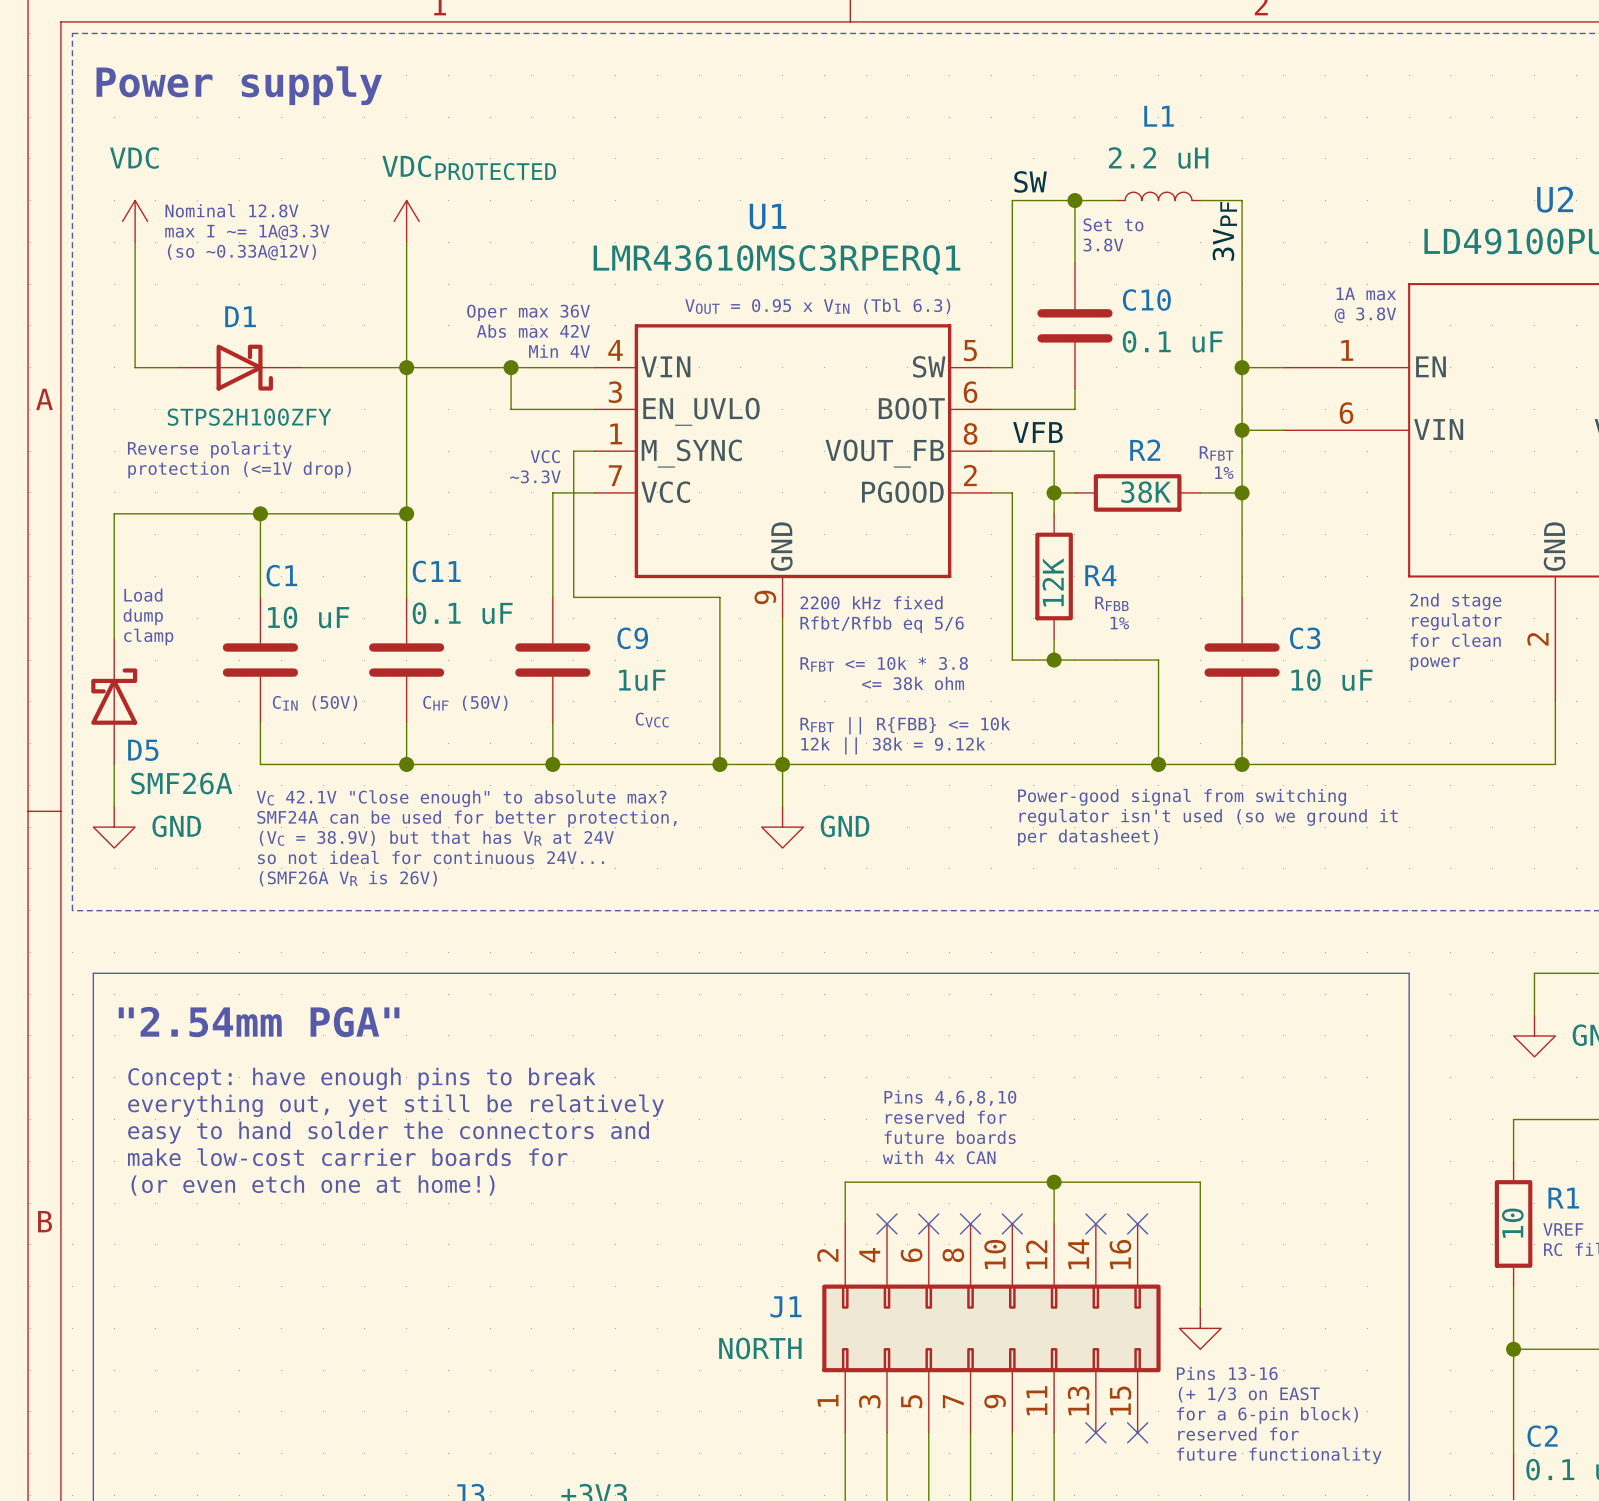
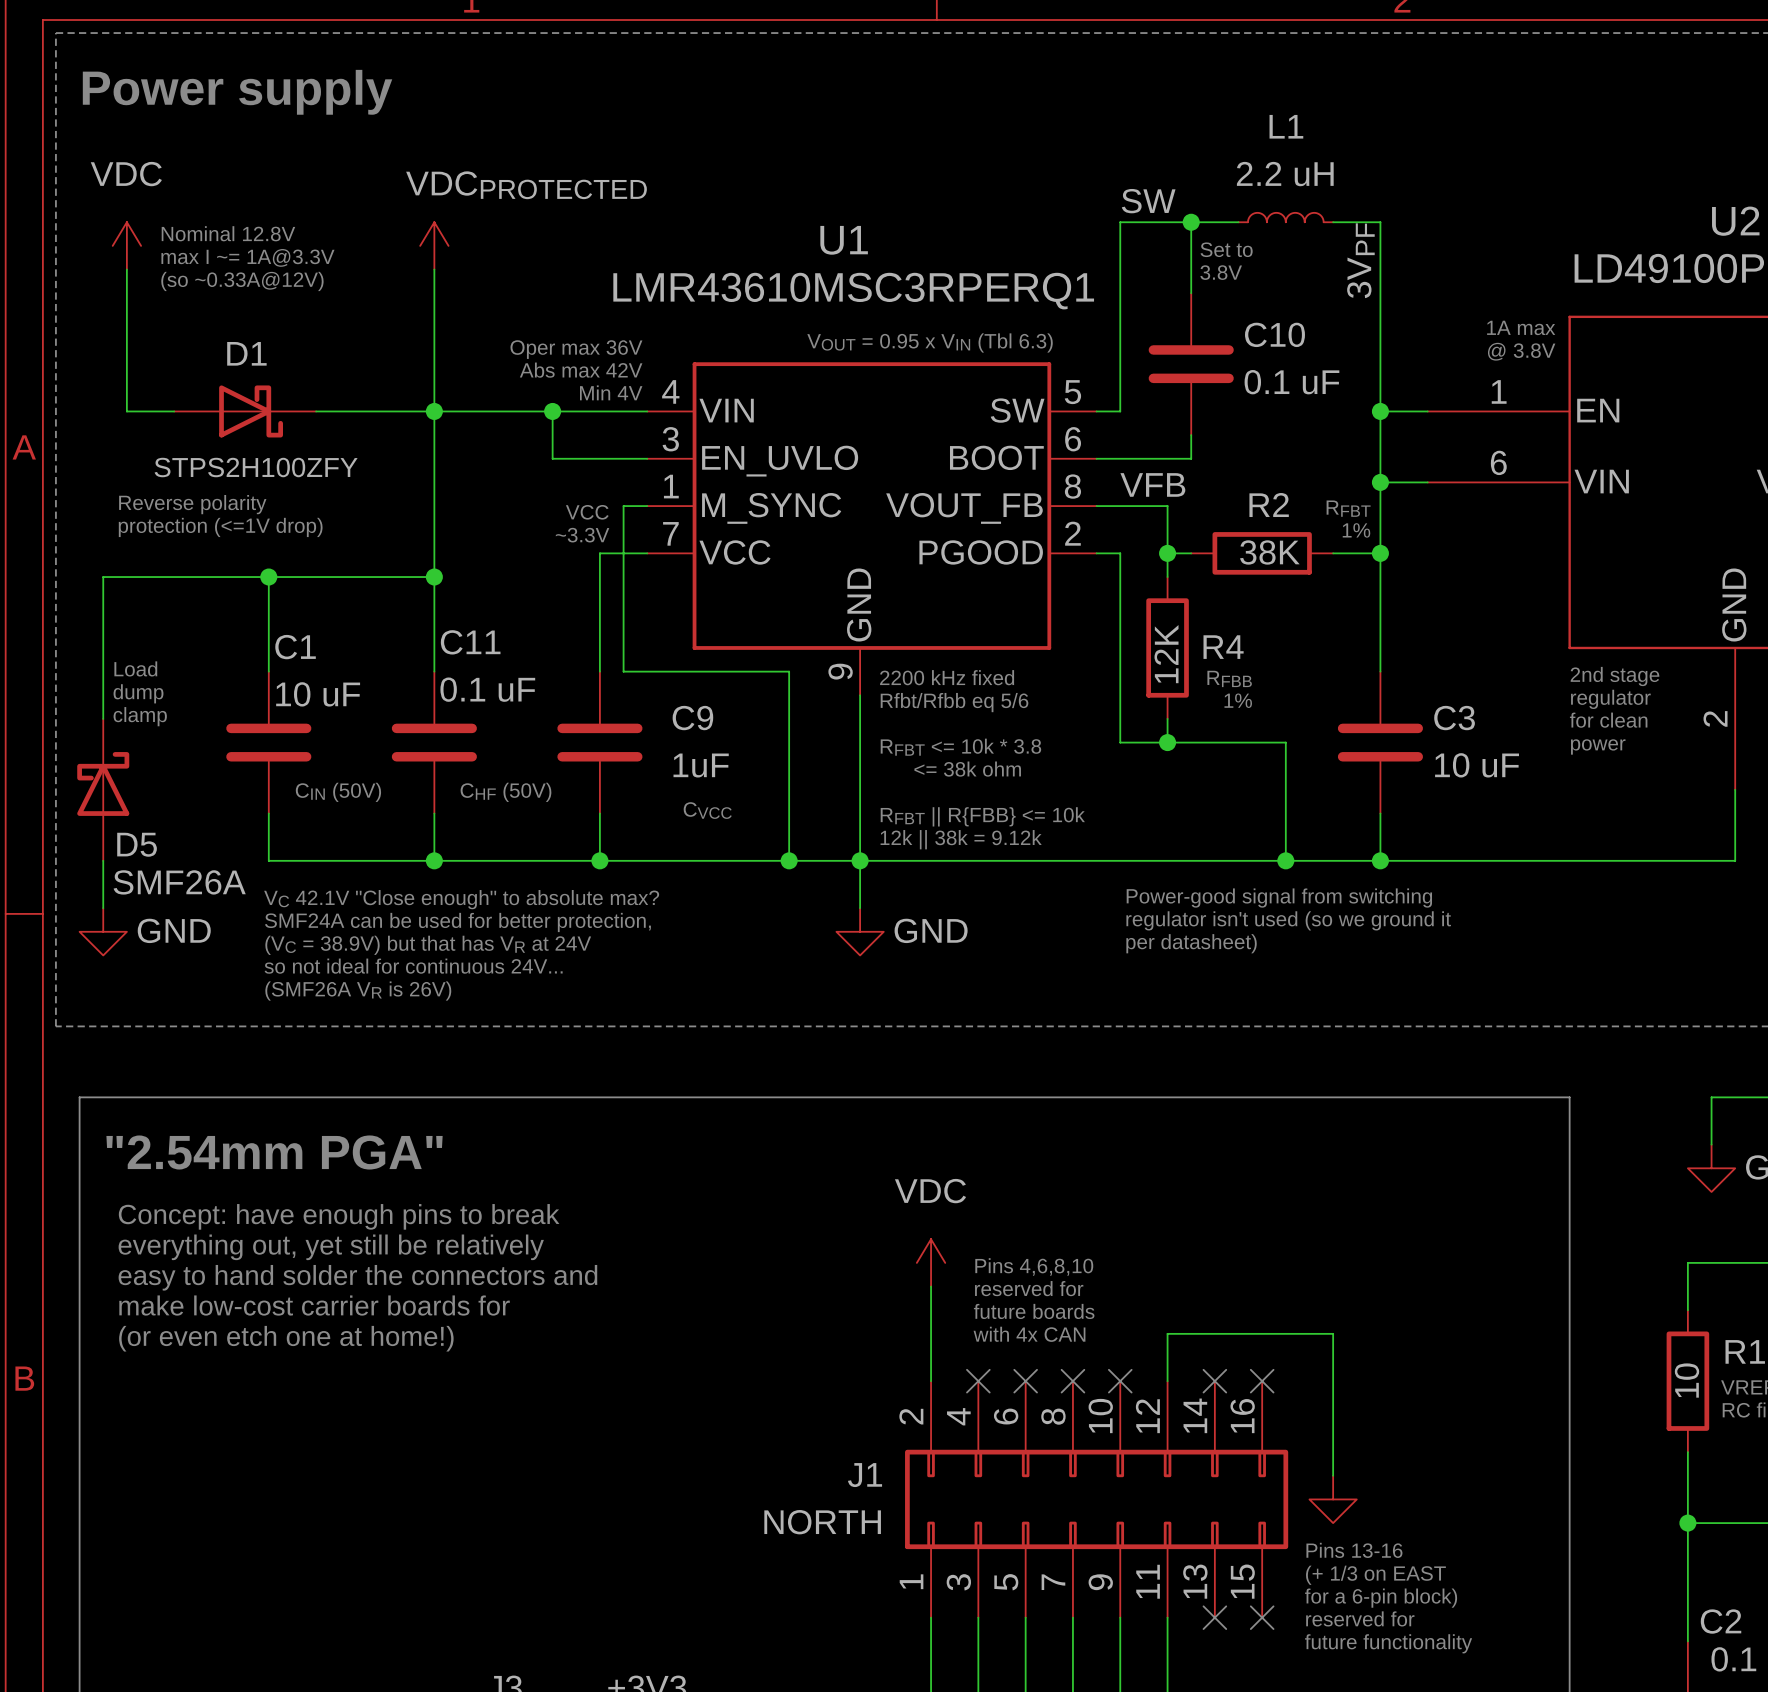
text: Pins 4,6,8,10 (950, 1098) -> none
text: reserved for (946, 1117) -> Pins 4,6,8,10 (1034, 1266)
power symbol: none -> VDC (931, 1262)
text: future boards (950, 1137) -> reserved for (1029, 1288)
text: with 4x CAN (939, 1157) -> future boards (1034, 1311)
wire: (845, 1182) (1054, 1182) -> (931, 1333) (931, 1286)
text: none -> with 4x CAN (1029, 1334)
junction: (1054, 1182) -> none

